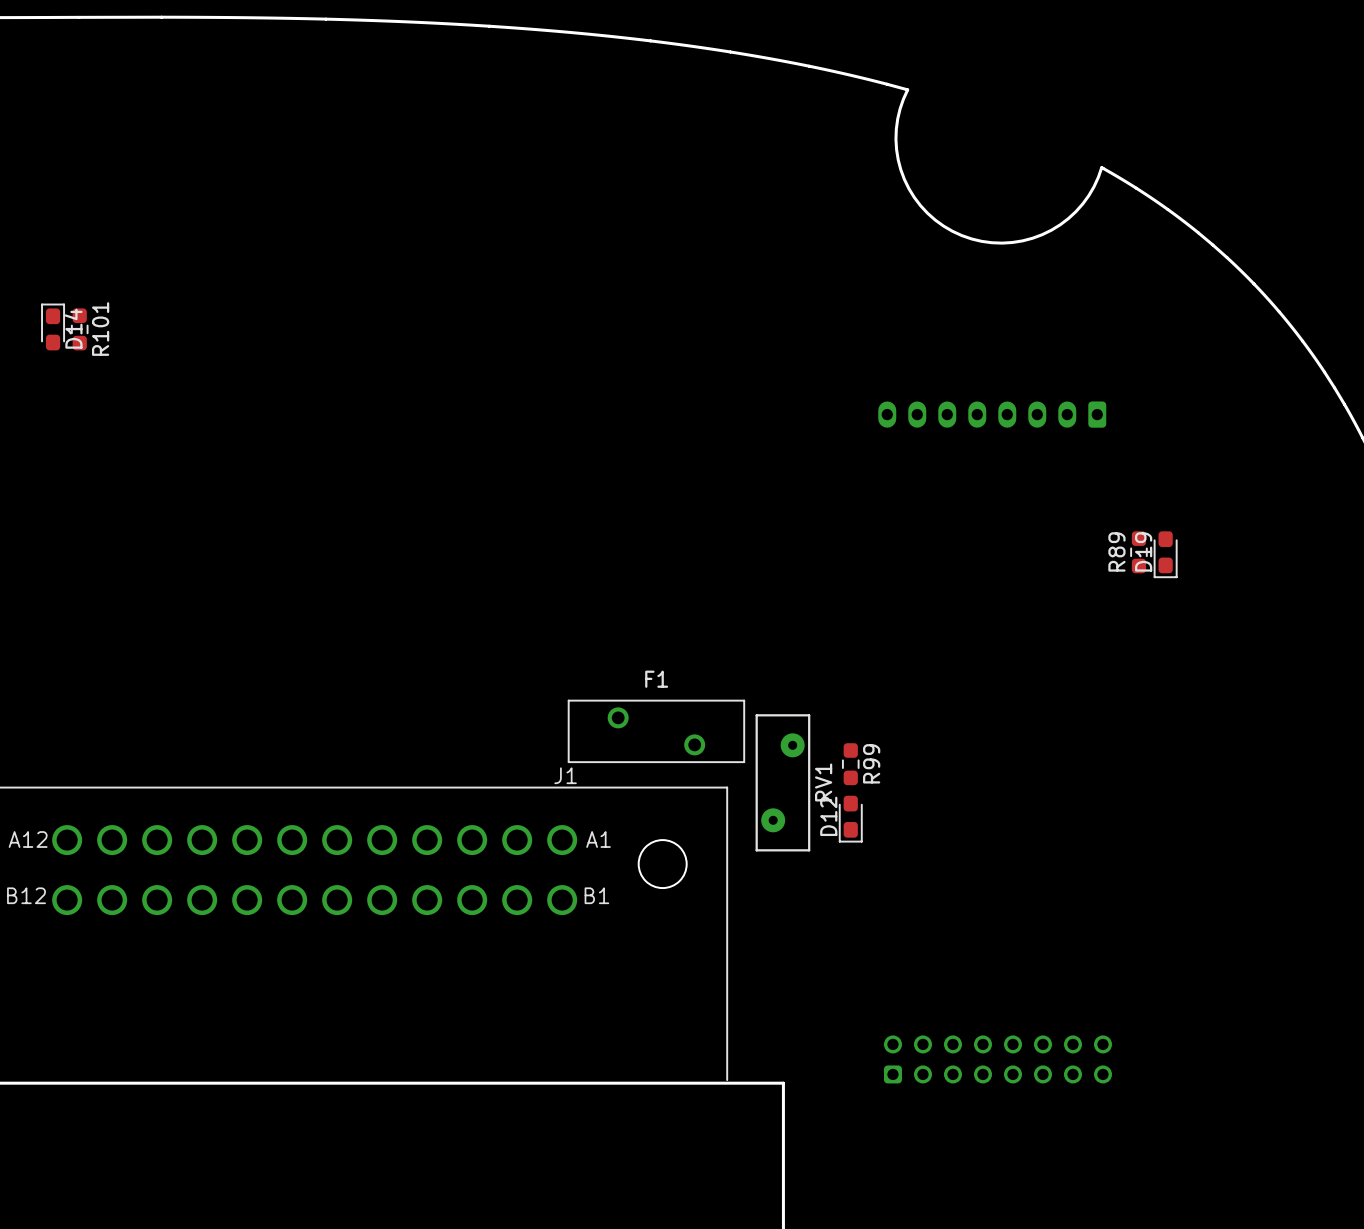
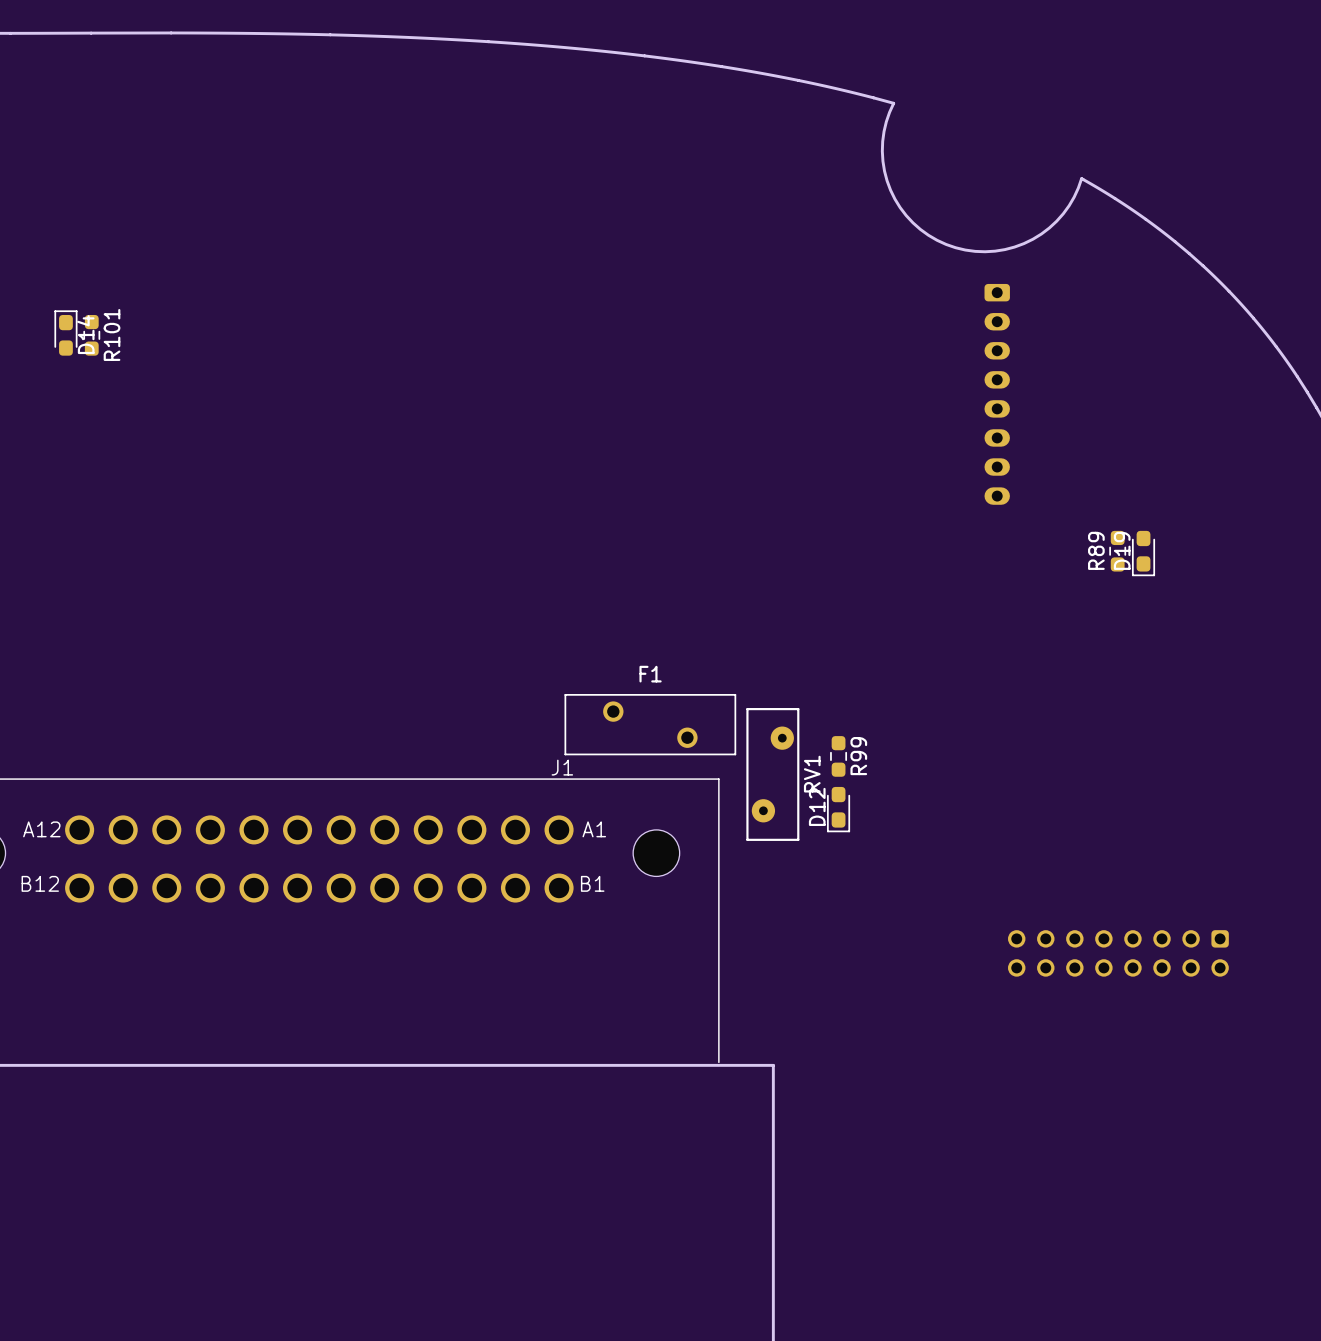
part rotation: 0° (992, 414) -> 90° counterclockwise (997, 394)
part rotation: 0° (997, 1059) -> 180° (1118, 953)
part position: (997, 1059) -> (1118, 953)

